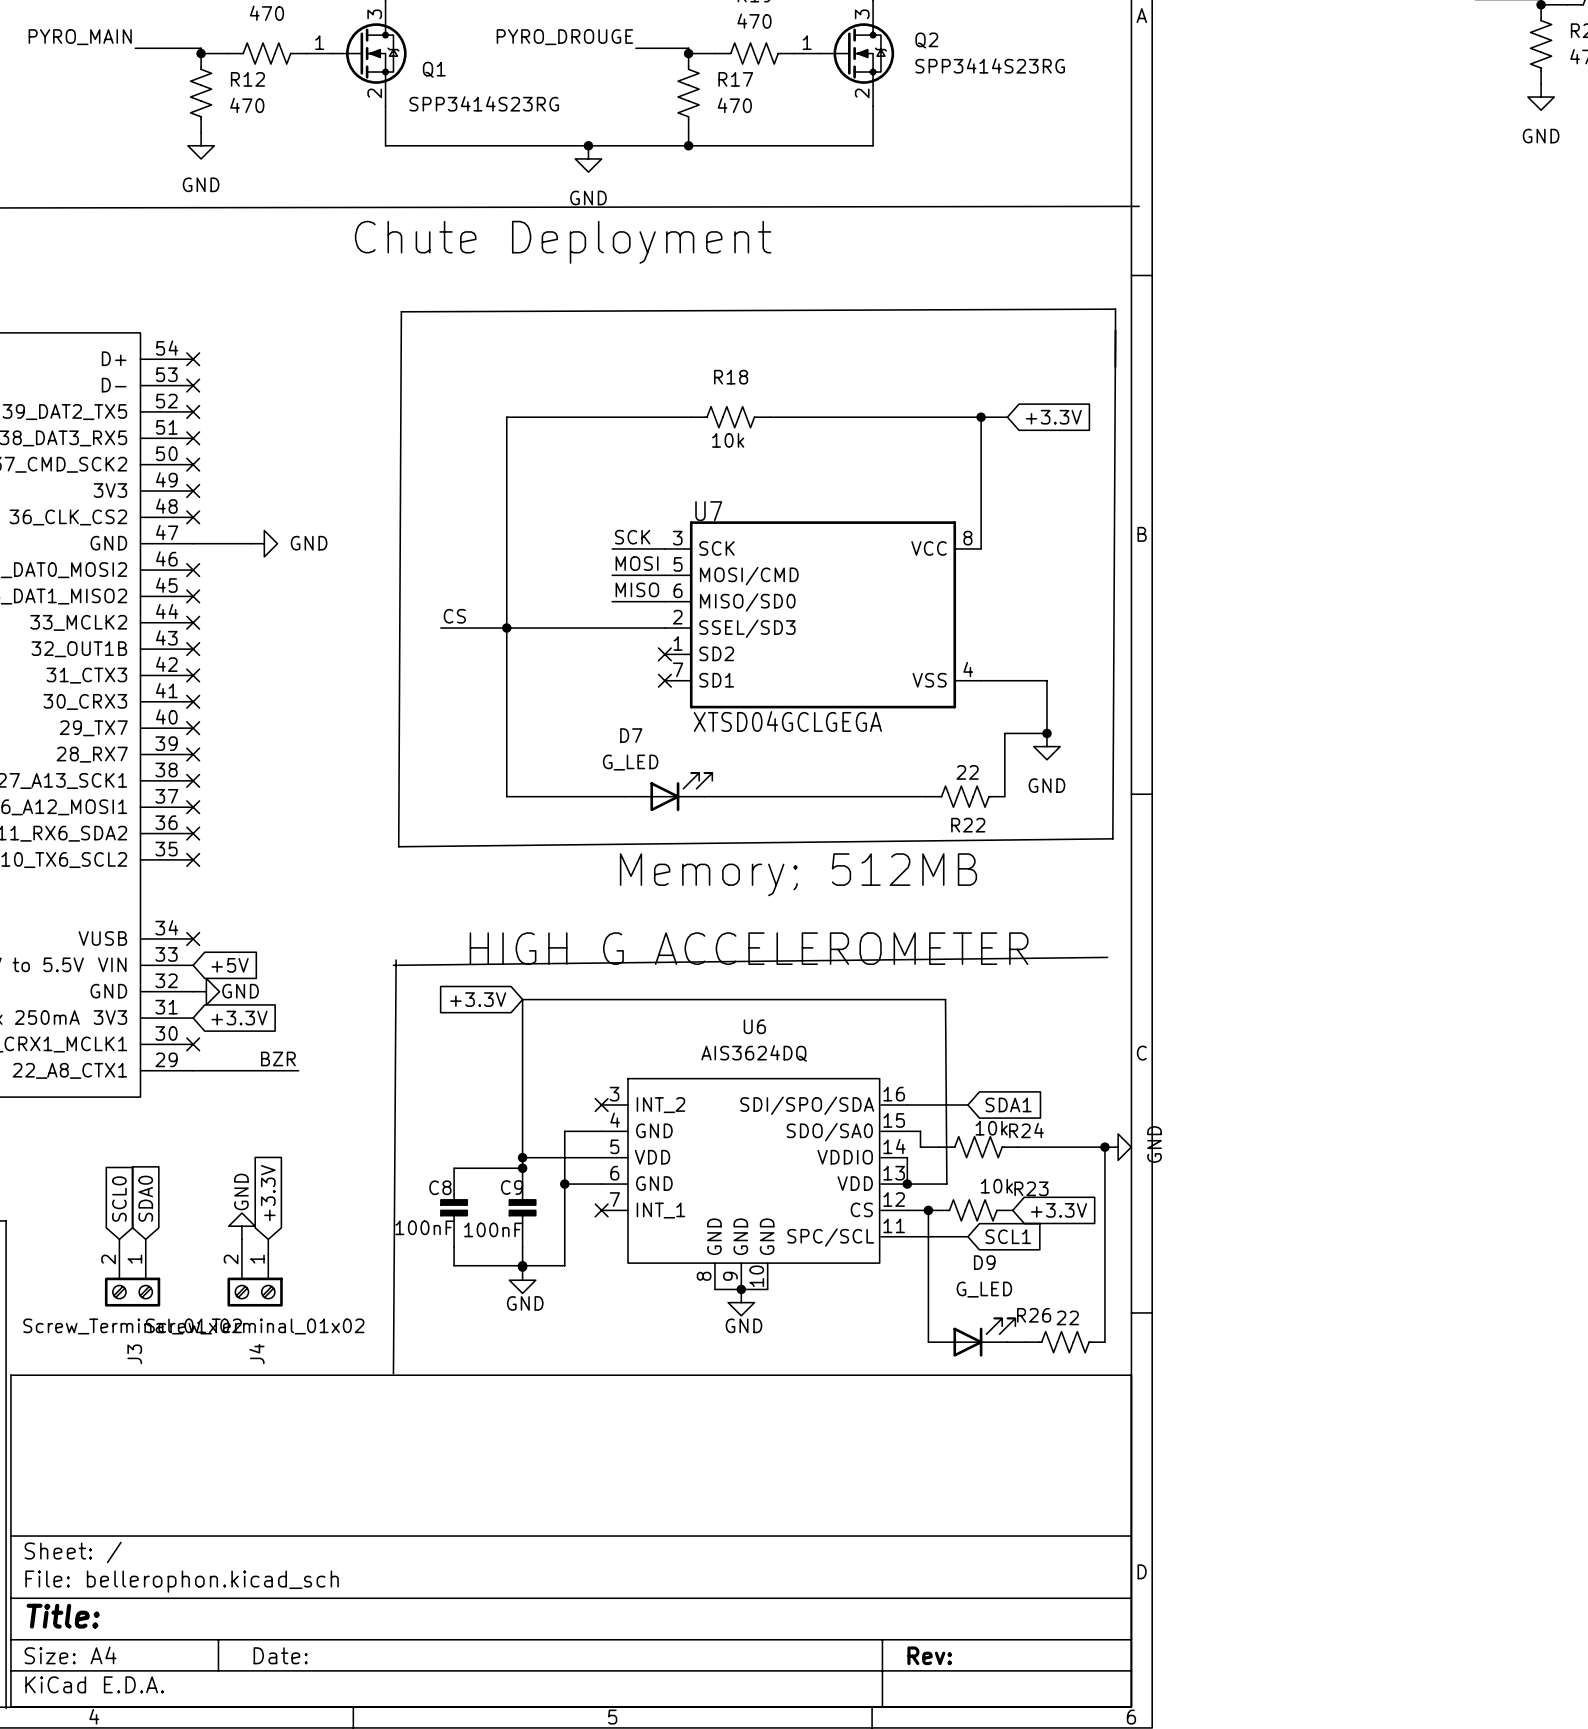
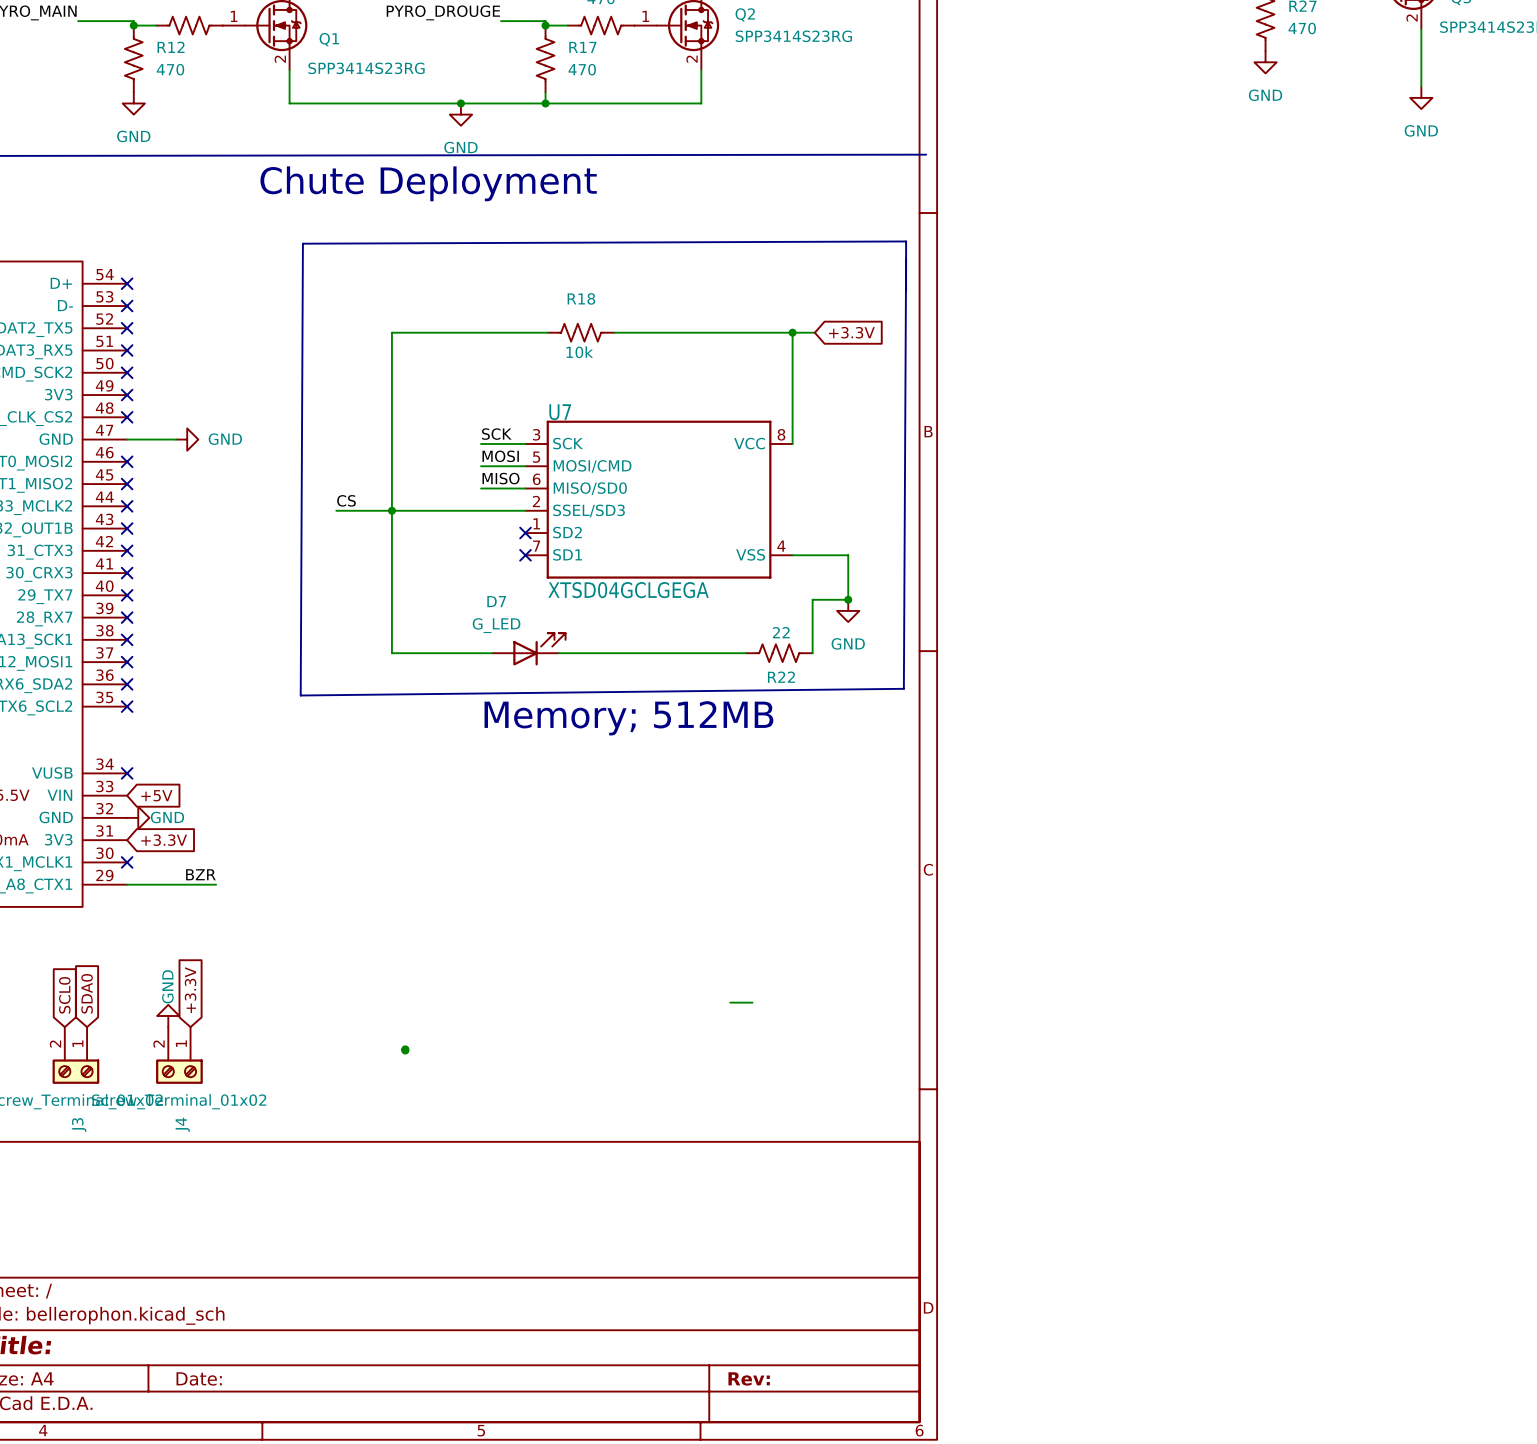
text: HIGH G ACCELEROMETER (749, 948) -> none
line: (1107, 957) (393, 965) -> none
line: (396, 960) (393, 1373) -> none
global label: +3.3V (478, 999) -> none
no-connect mark: (601, 1104) -> none
wire: (907, 1104) (967, 1104) -> none
global label: SDA1 (1008, 1104) -> none
wire: (601, 1131) (564, 1131) (564, 1265) (454, 1265) (454, 1247) -> none
wire: (907, 1131) (920, 1131) (920, 1147) (938, 1147) -> none
R24: 10k (978, 1147) -> none
wire: (1018, 1147) (1104, 1147) (1104, 1342) -> none
junction: (1104, 1147) -> none
power symbol: GND (1118, 1147) -> none
wire: (522, 1157) (601, 1157) -> none
junction: (522, 1157) -> none
wire: (907, 1157) (907, 1184) (946, 1184) (945, 999) (522, 999) (522, 1168) (454, 1168) -> none
junction: (522, 1168) -> none
wire: (564, 1184) (601, 1184) -> none
junction: (564, 1184) -> none
U6: AIS3624DQ (754, 1184) -> none
junction: (907, 1184) -> none
C8: 100nF (454, 1207) -> none
C9: 100nF (522, 1207) -> none
no-connect mark: (601, 1210) -> none
wire: (928, 1210) (928, 1342) -> none
junction: (928, 1210) -> none
R23: 10k (973, 1210) -> none
global label: +3.3V (1059, 1210) -> none
wire: (907, 1236) (967, 1236) -> none
global label: SCL1 (1008, 1236) -> none
wire: (522, 1247) (522, 1267) -> none
power symbol: GND (522, 1280) -> none
wire: (714, 1289) (767, 1289) -> none
junction: (741, 1289) -> none
power symbol: GND (741, 1302) -> none
D9: G_LED (971, 1337) -> none
wire: (1007, 1342) (1025, 1342) -> none
R26: 22 (1065, 1342) -> none

